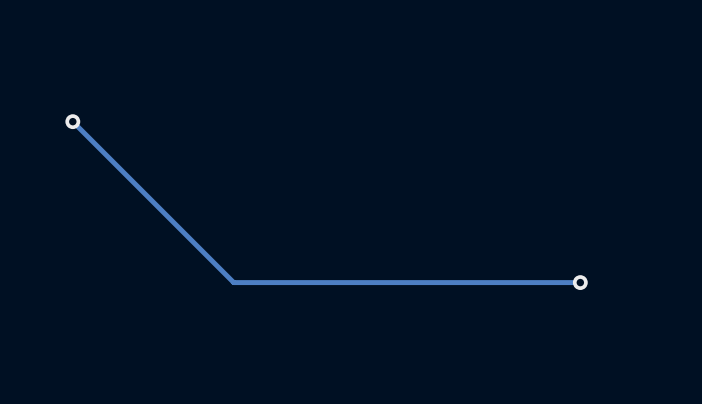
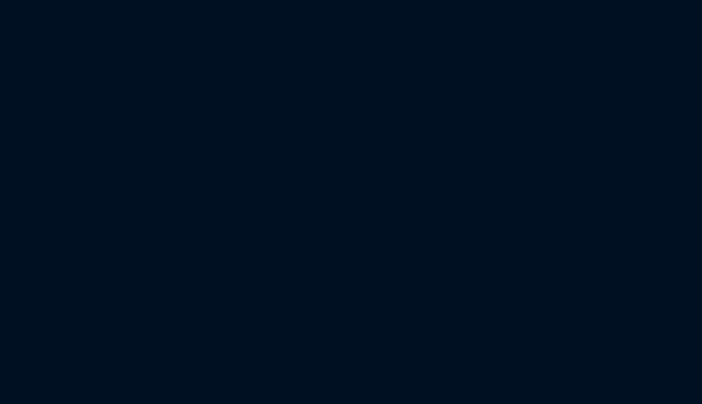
track: (72, 121) (233, 282) (580, 282) -> none
via: (72, 121) -> none
via: (580, 282) -> none

